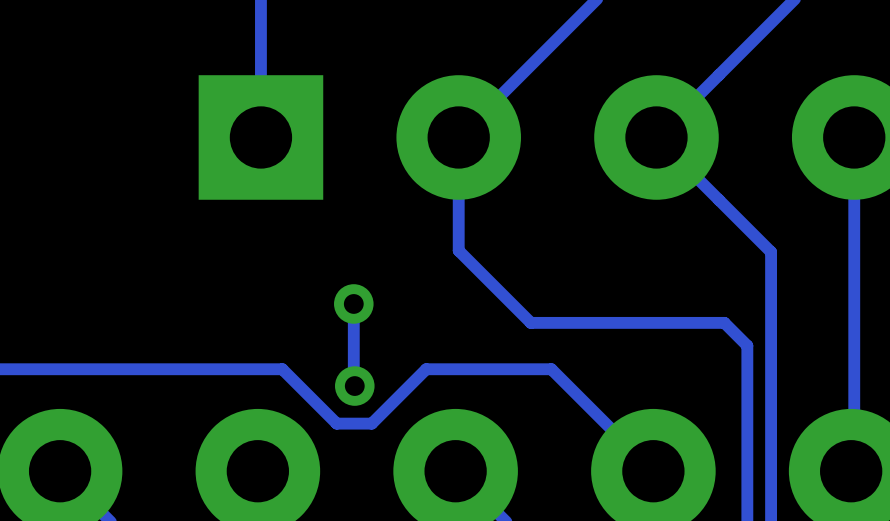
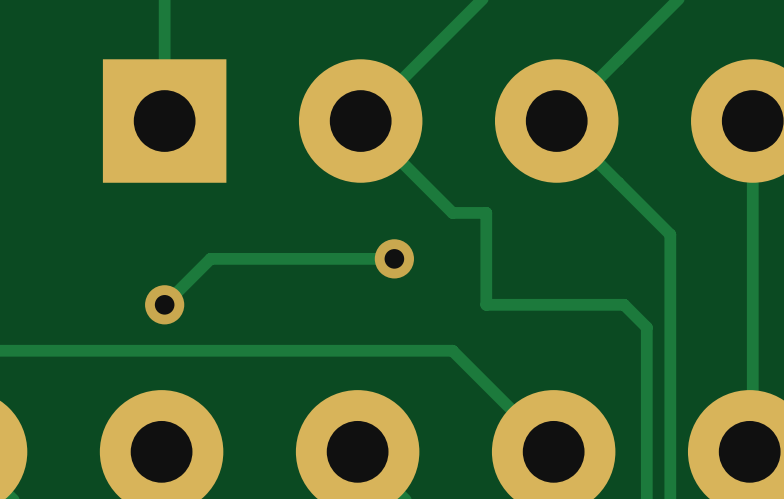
track: (458, 137) (458, 250) (530, 322) (585, 322) -> (360, 121) (452, 212) (486, 212) (486, 304)
track: none -> (394, 258) (210, 258) (164, 304)
via: none -> (394, 258)
track: (353, 303) (353, 385) -> none
via: (353, 303) -> none
via: none -> (164, 304)
track: (426, 369) (371, 423) (336, 423) (282, 369) -> (328, 350) (185, 350)
via: (354, 386) -> none

